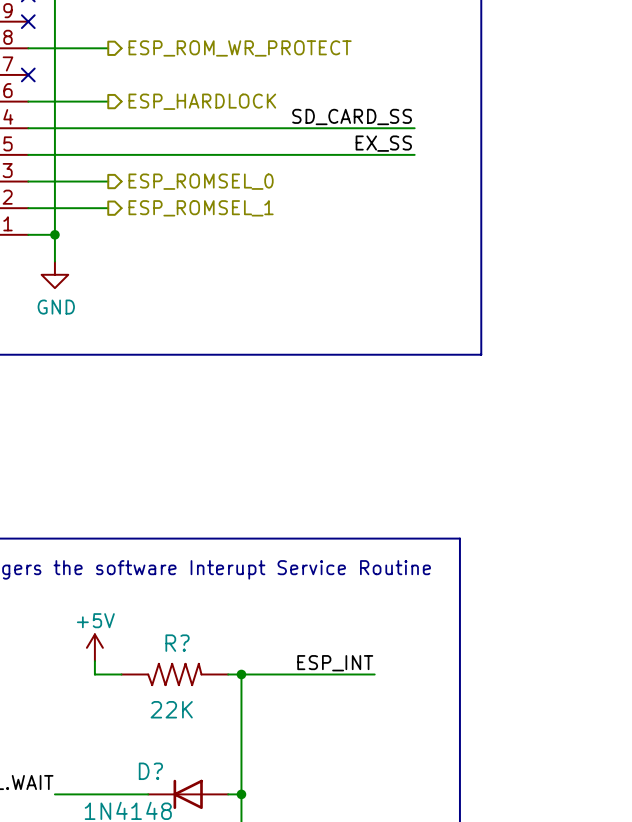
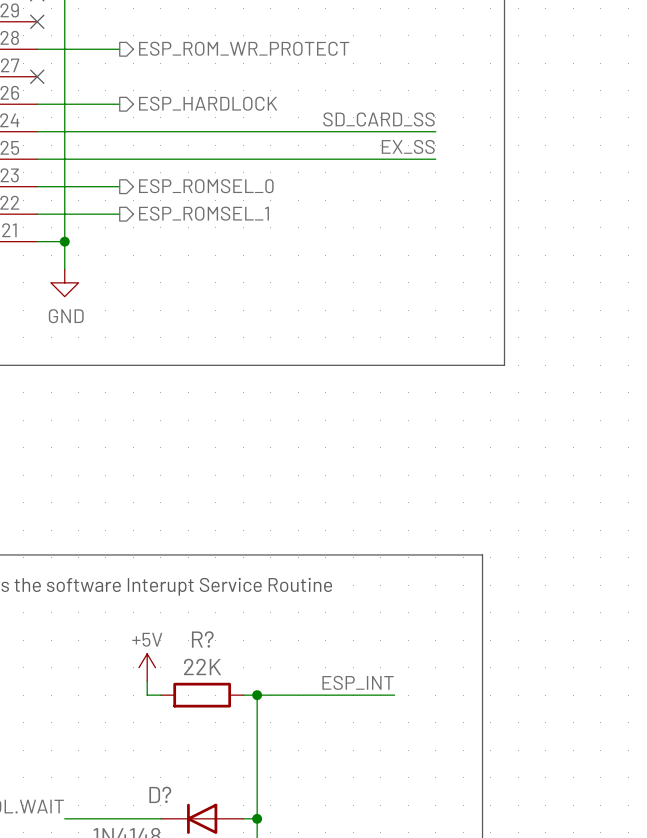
power symbol position: +5V (94, 647) -> +5V (147, 667)
wire: (94, 661) (94, 674) (121, 674) -> none
wire: none -> (147, 681) (147, 695) (160, 695)
R?: 22K (174, 674) -> none
R?: none -> 22K (202, 695)

